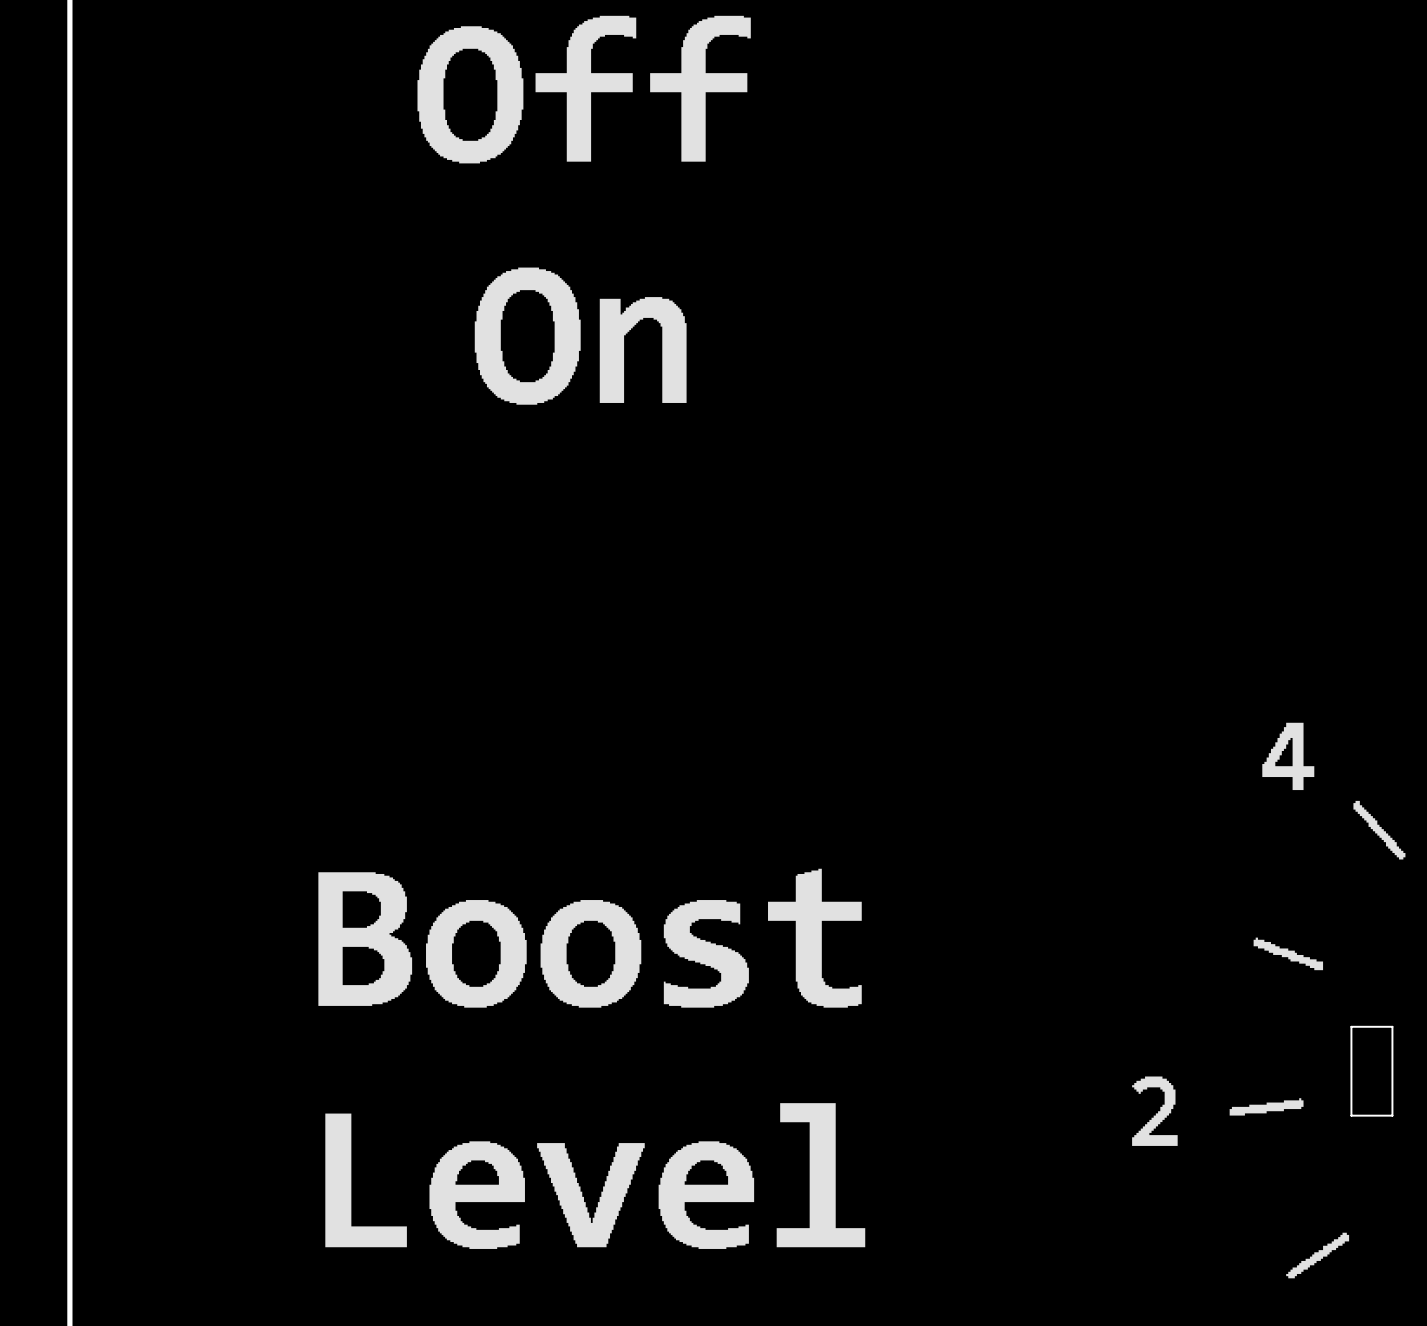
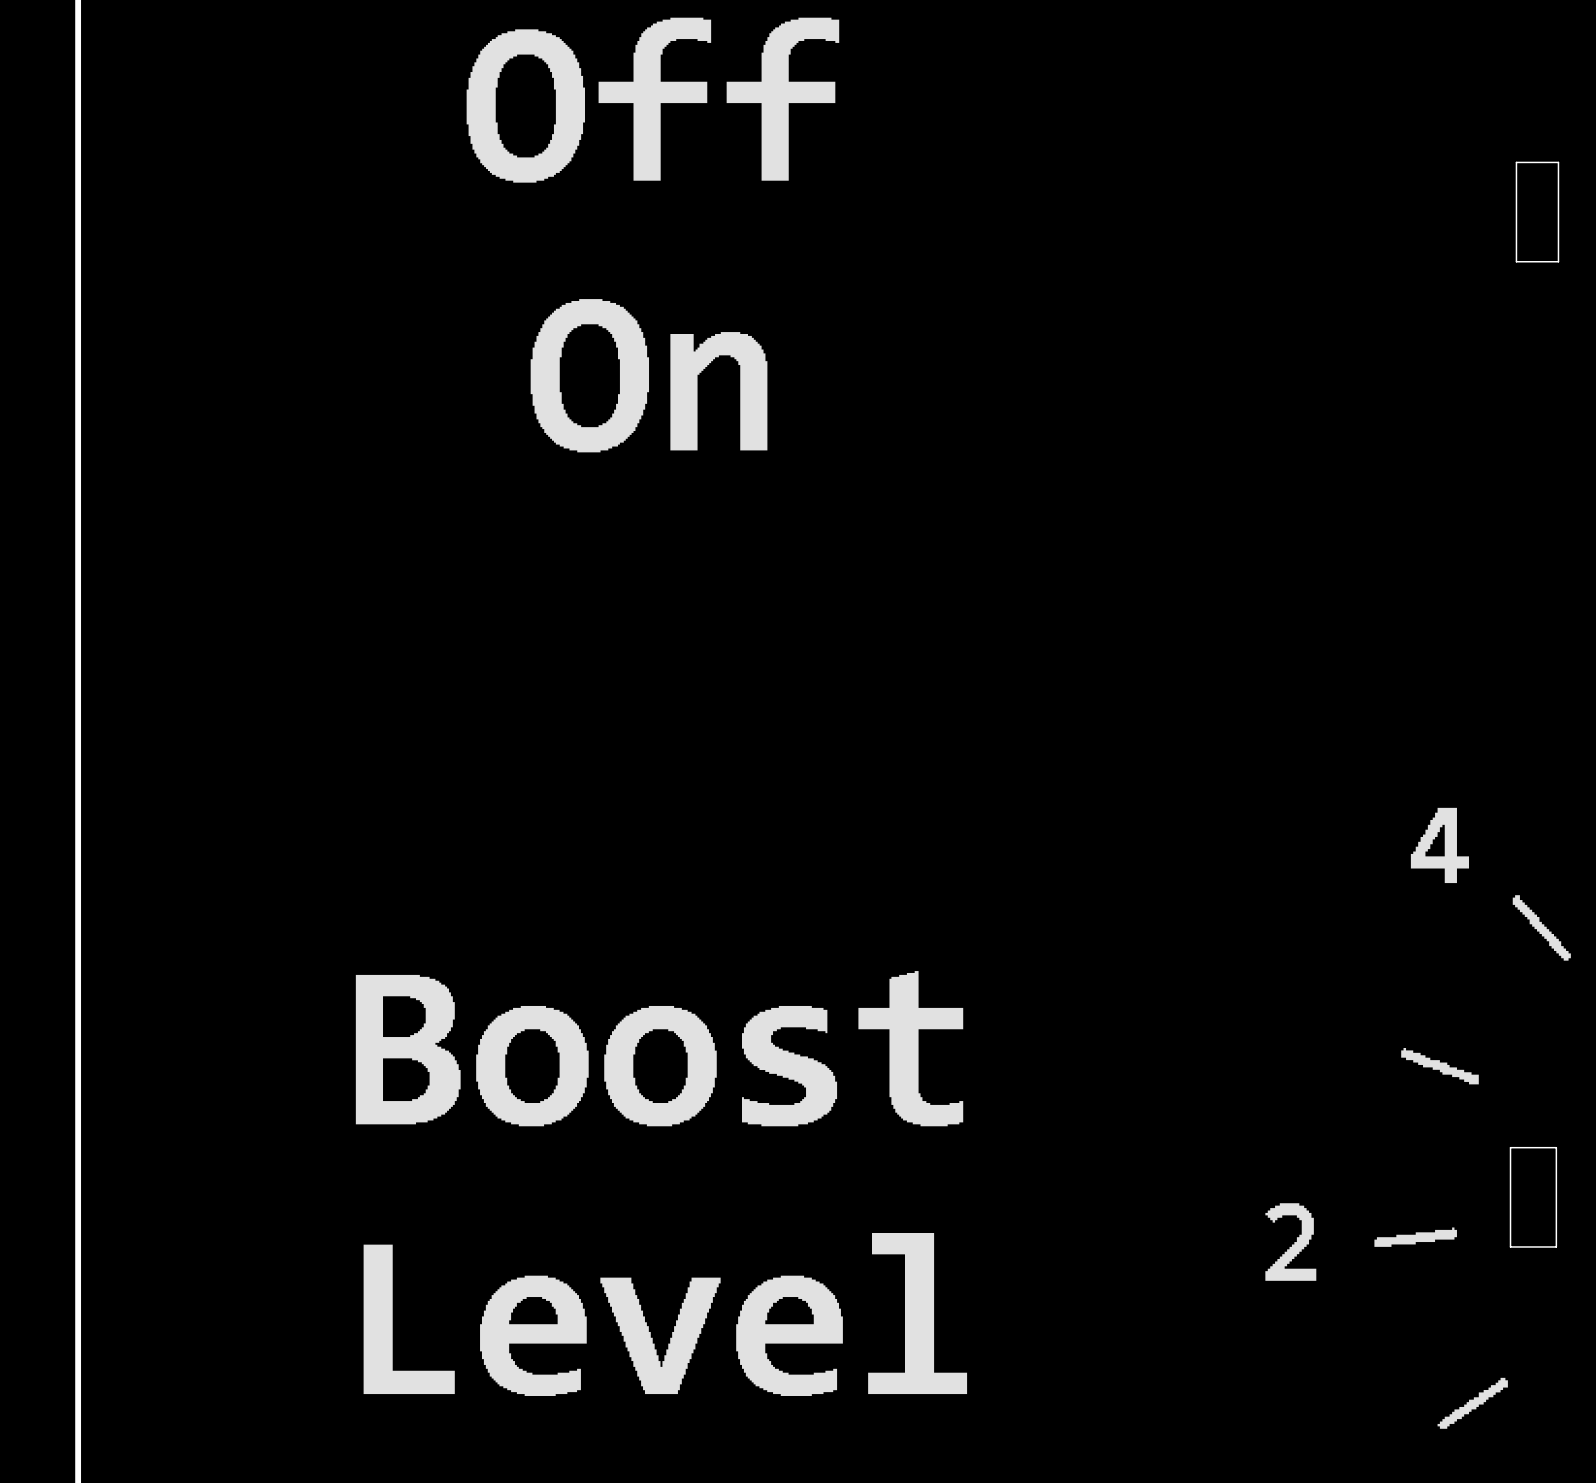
board edge: none -> (1516, 162) (1558, 162) (1558, 261) (1516, 261) (1516, 162)

